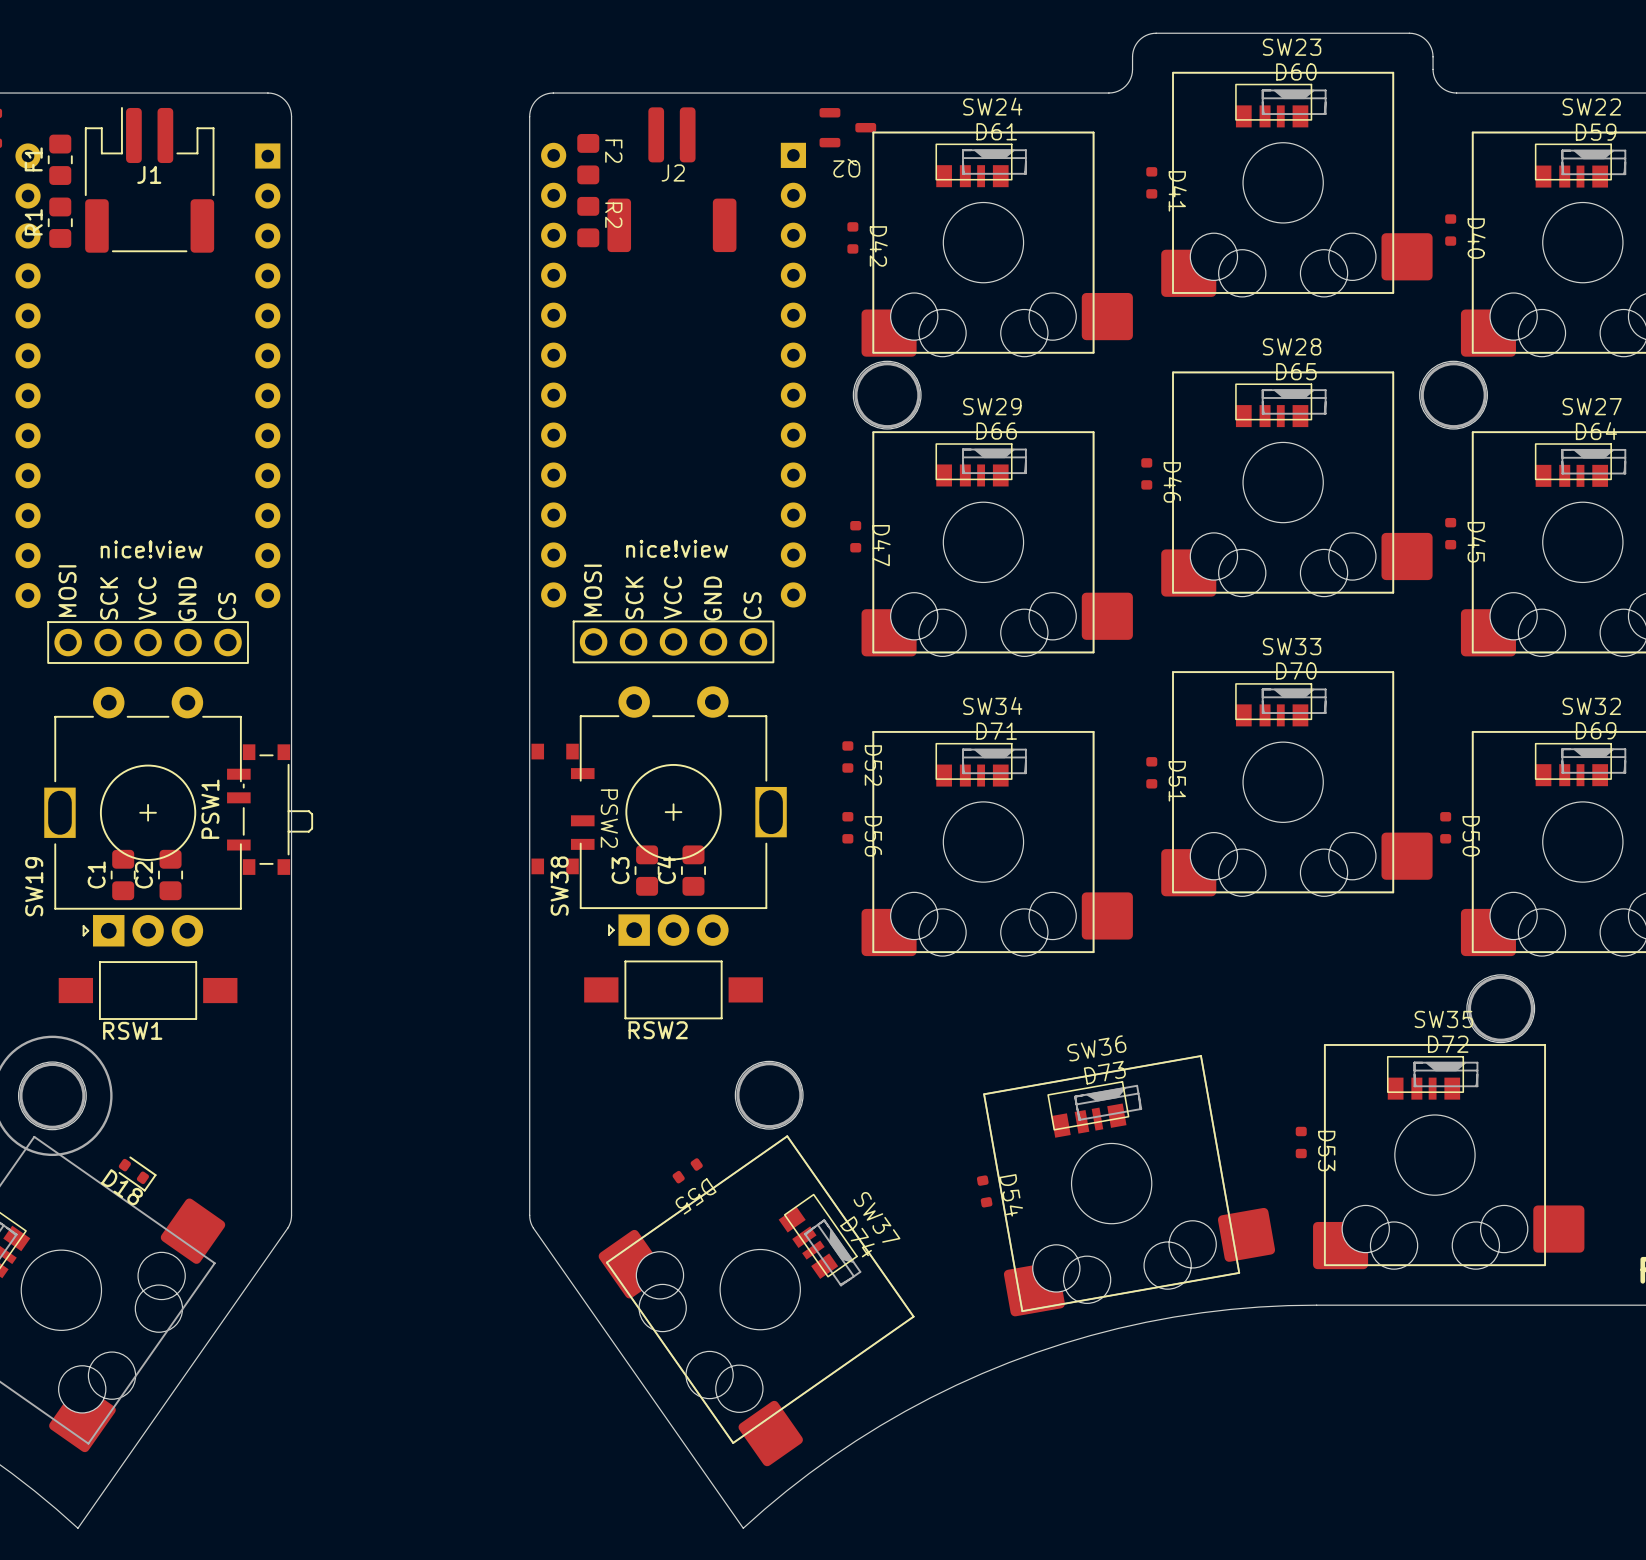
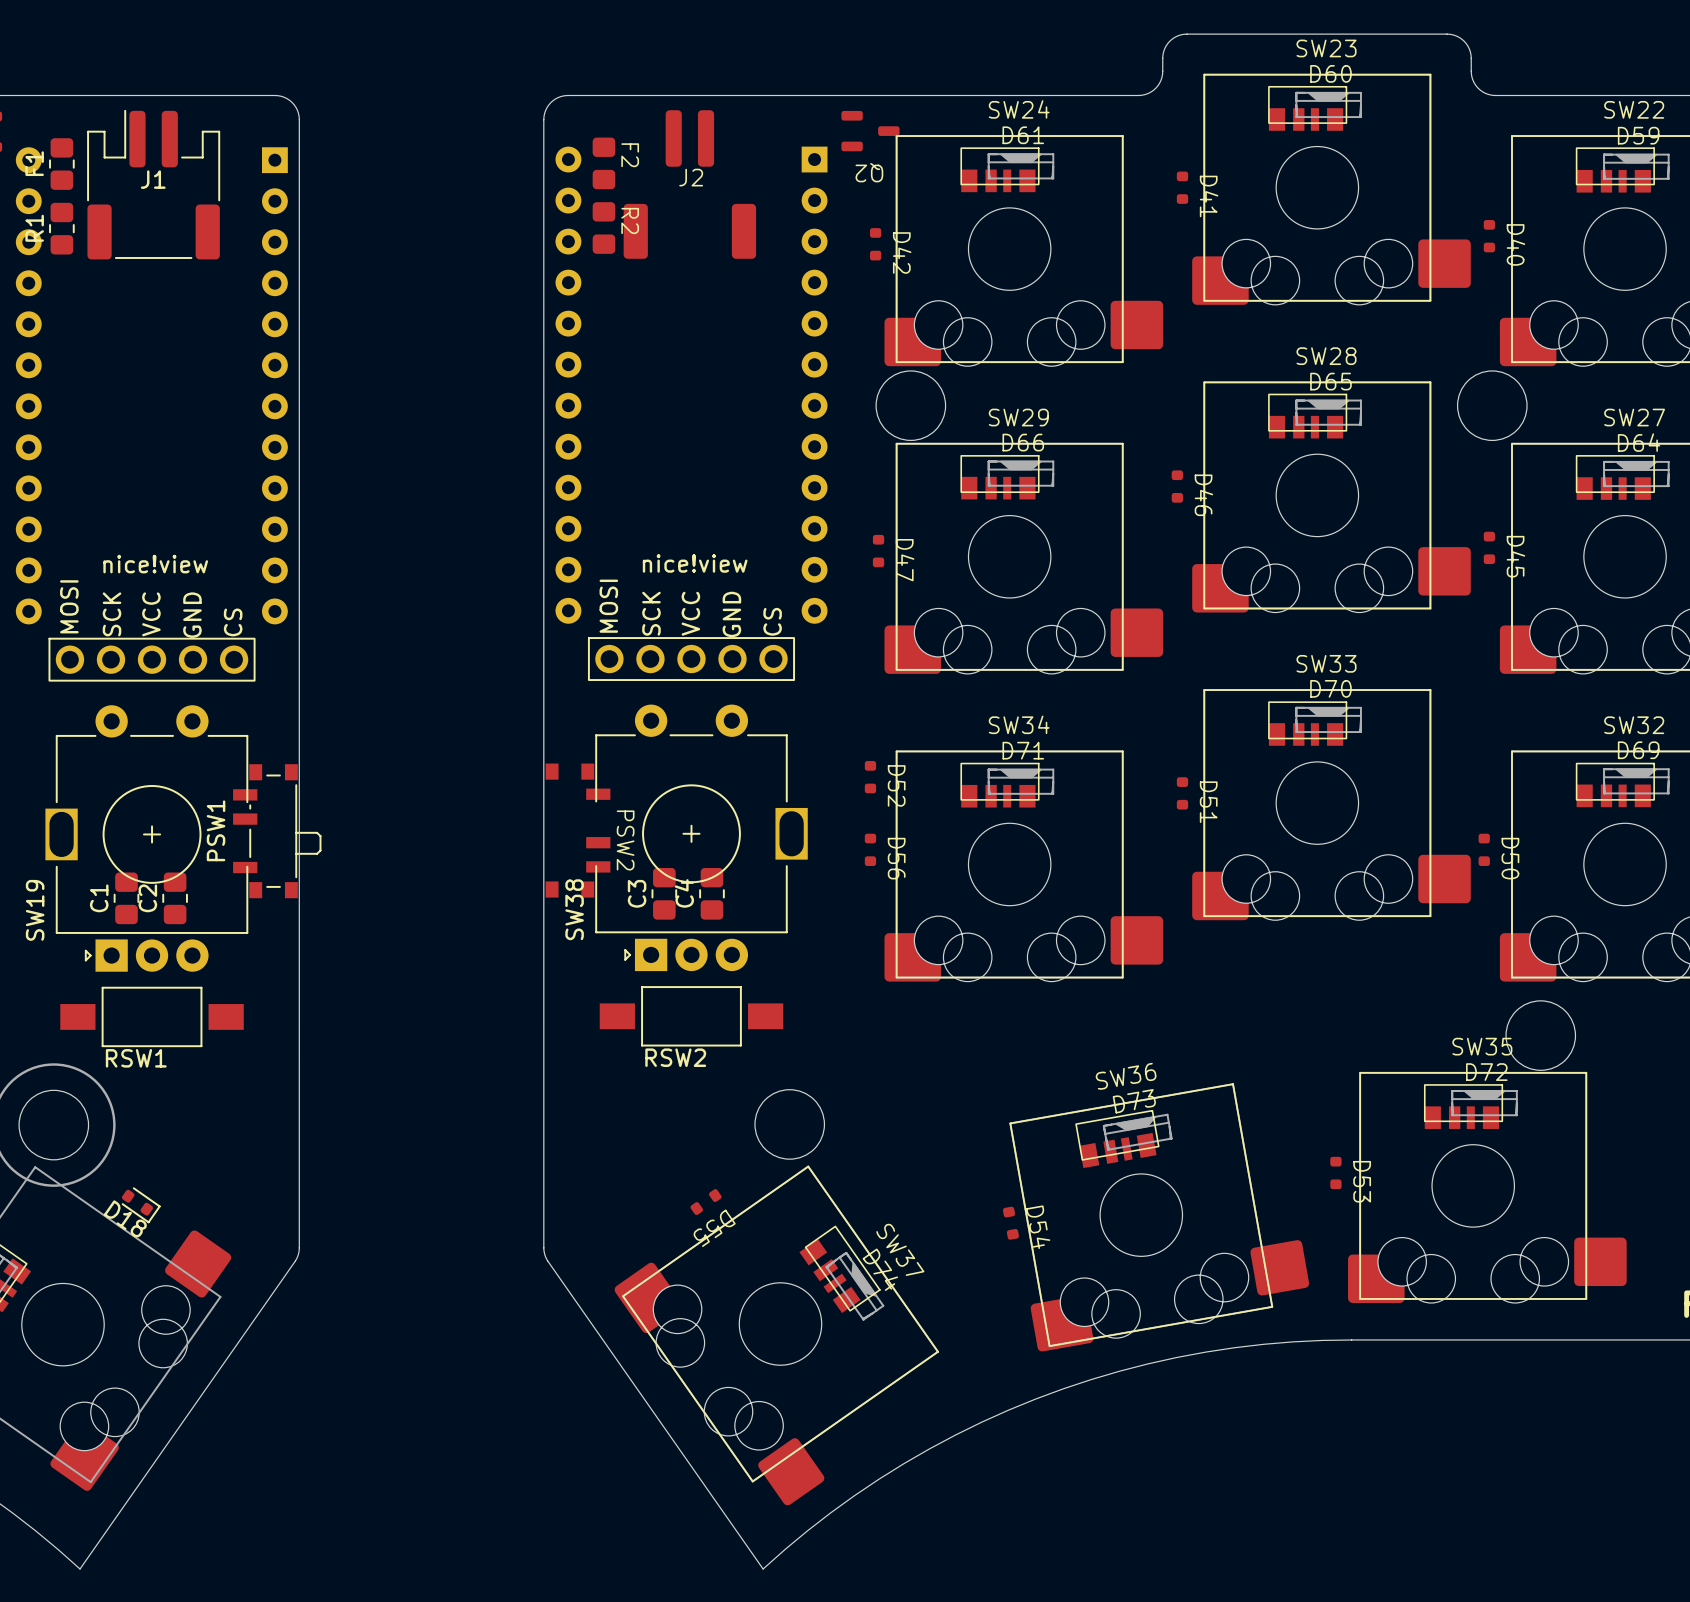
drawing: [854, 362, 921, 429] -> none
drawing: [1420, 362, 1487, 429] -> none
drawing: [1467, 975, 1534, 1042] -> none
drawing: [19, 1062, 86, 1129] -> none
drawing: [736, 1062, 803, 1129] -> none

